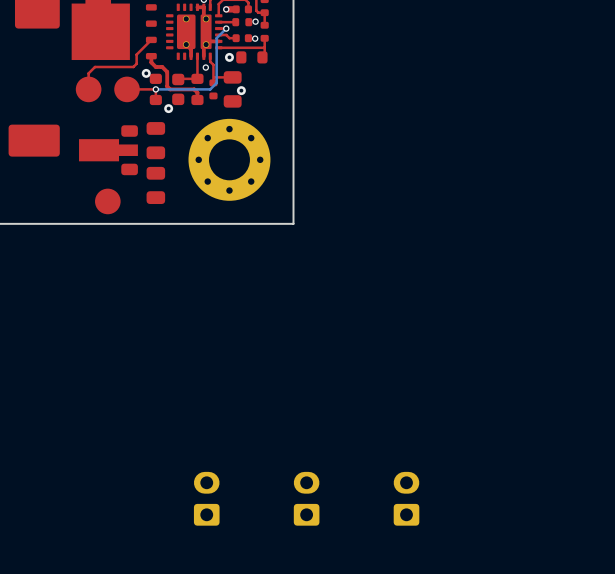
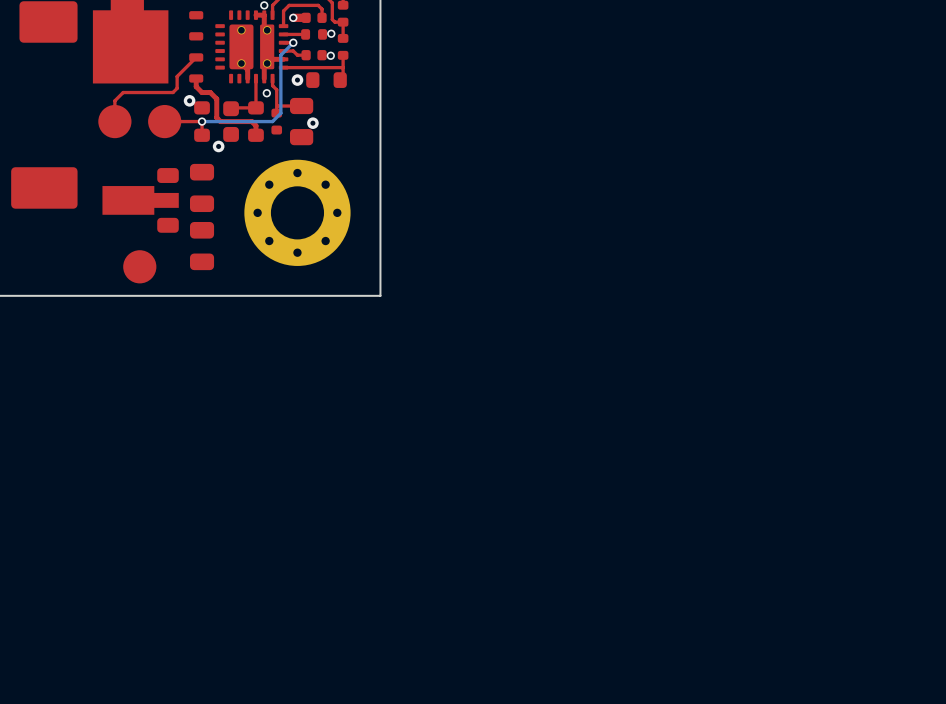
part: (206, 498) -> none
part: (306, 498) -> none
part: (406, 498) -> none

